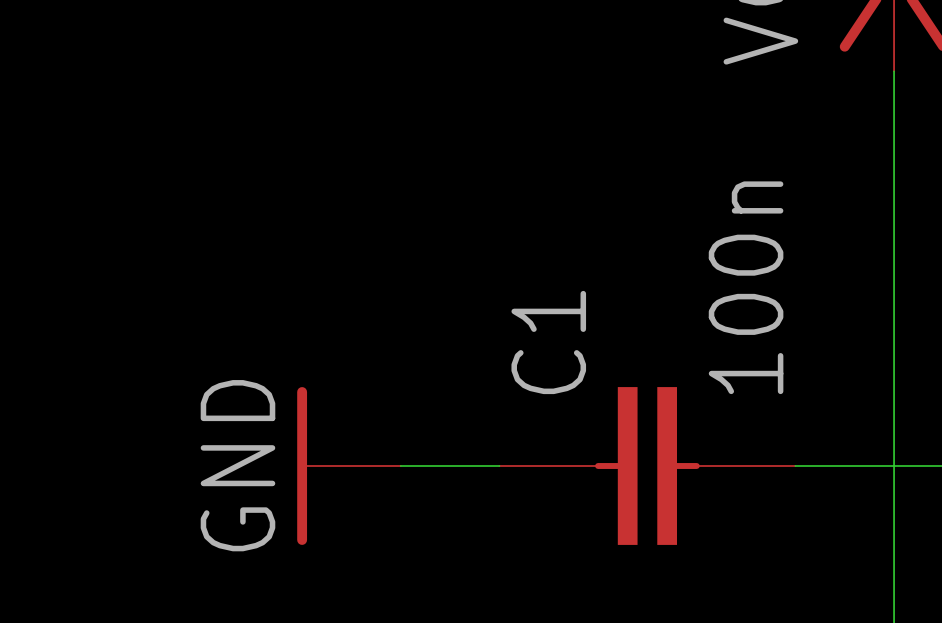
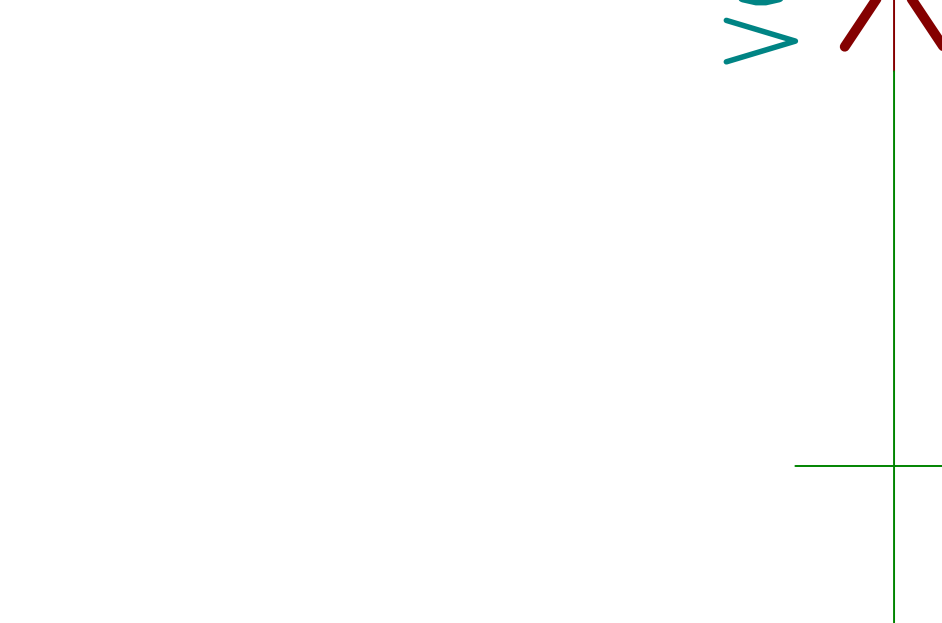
power symbol: GND (348, 465) -> none
wire: (400, 465) (499, 465) -> none
C1: 100n (647, 465) -> none

